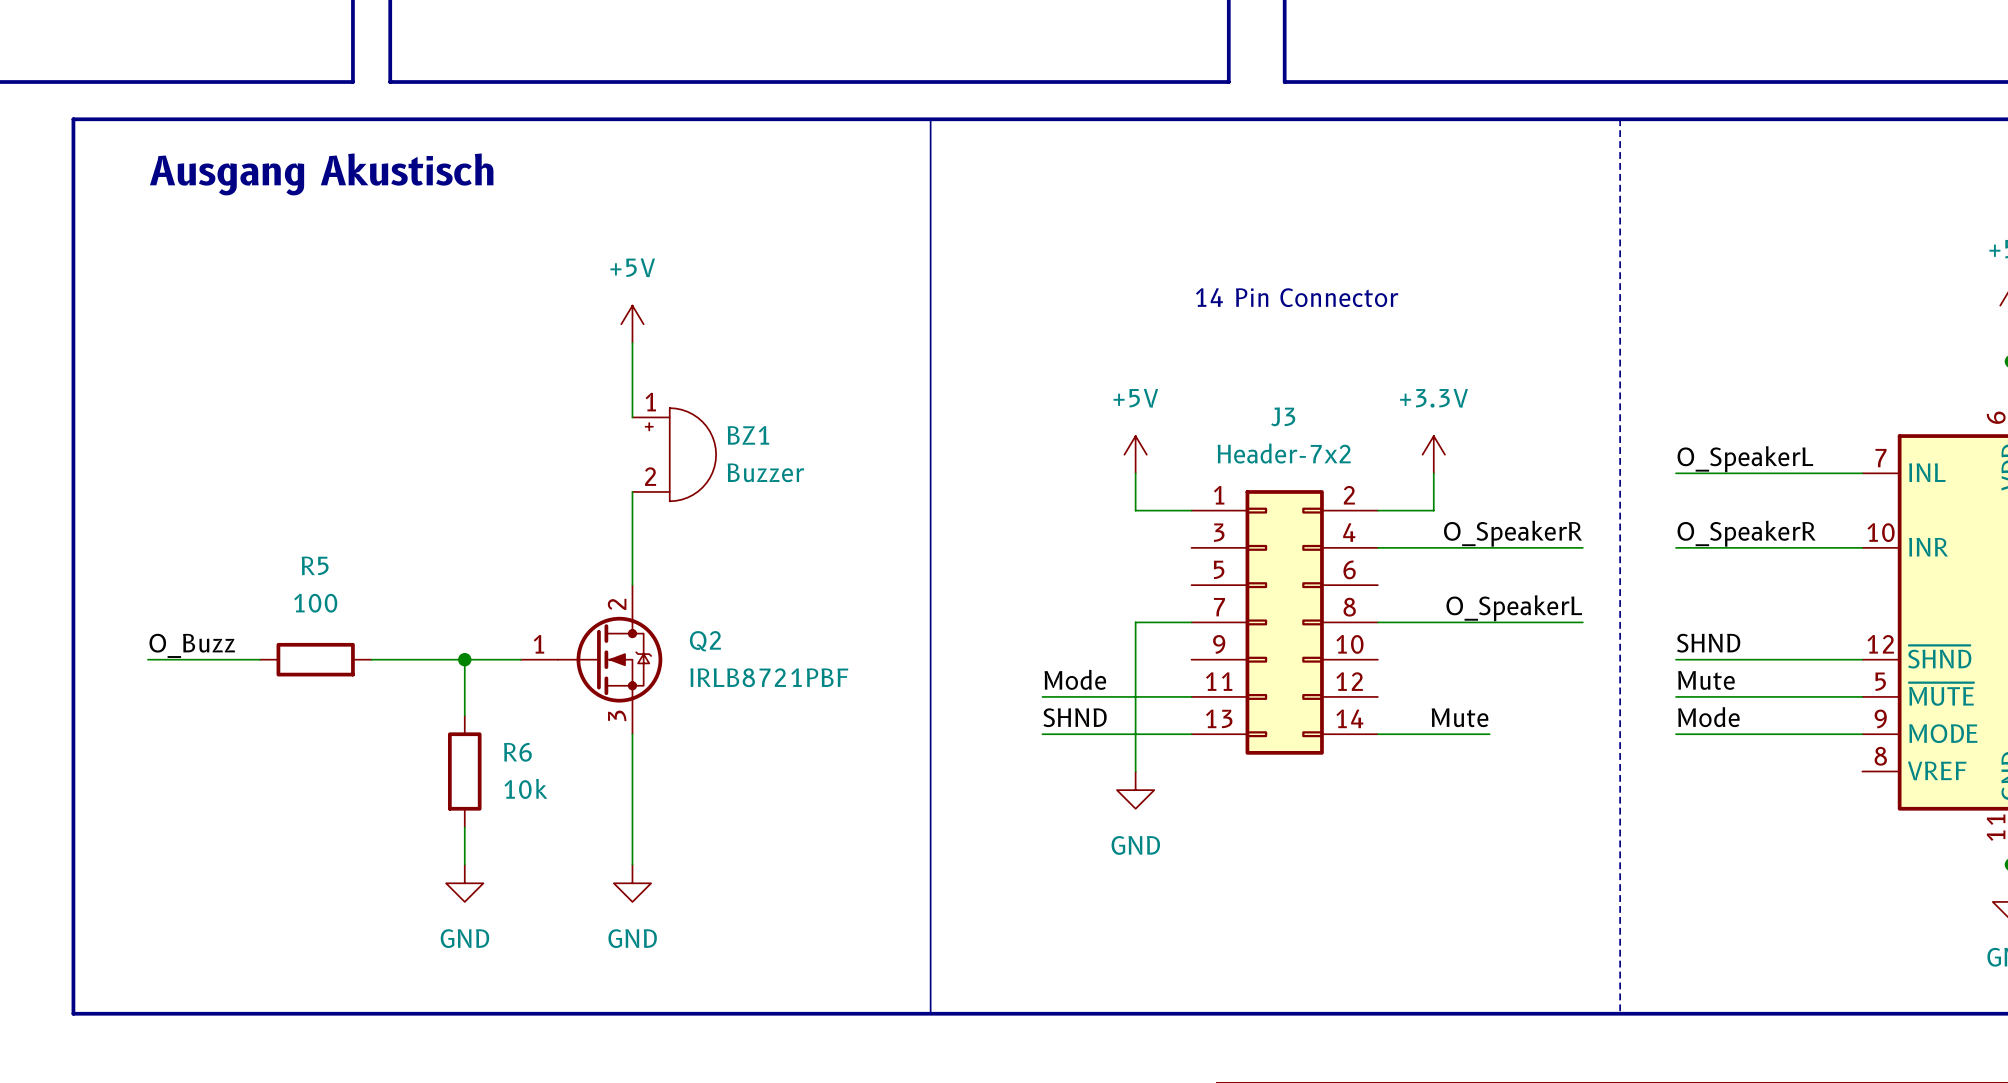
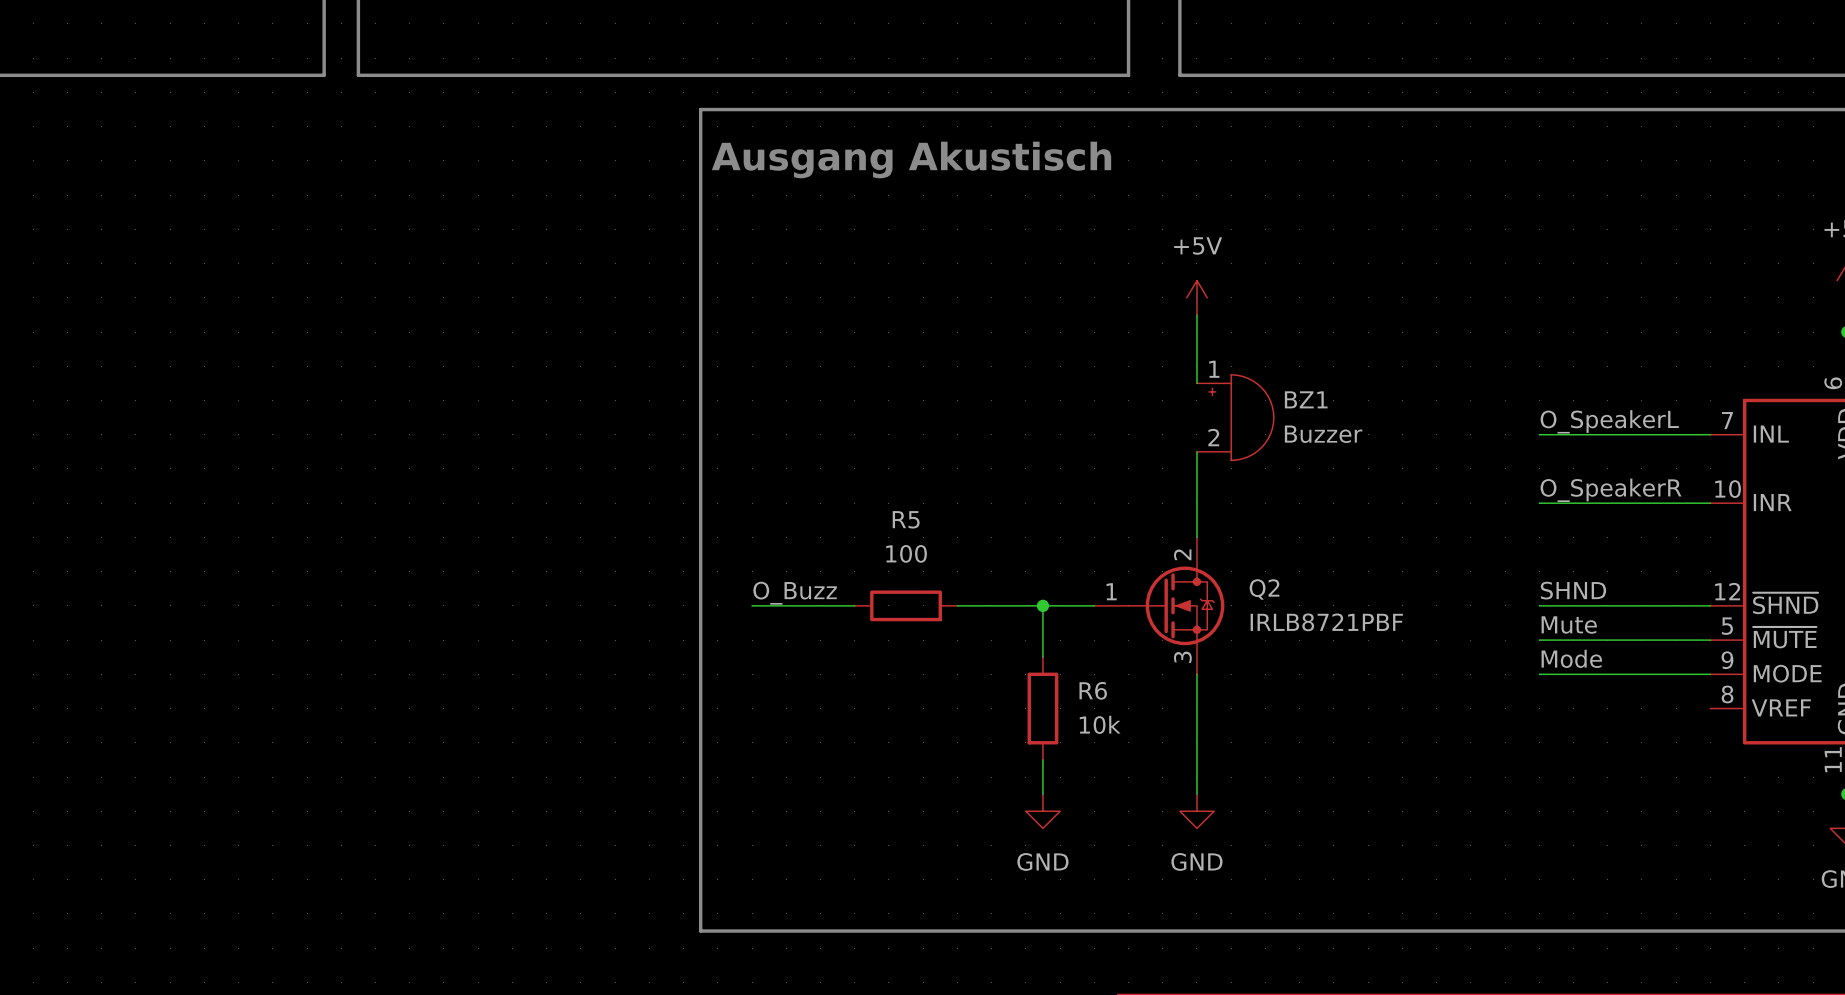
line: (762, 119) (73, 119) (73, 1013) (762, 1013) -> (700, 109) (700, 931)
line: (930, 119) (930, 1013) -> none
line: (1620, 119) (1620, 1013) -> none
text: Ausgang Akustisch (321, 174) -> none
text: none -> Ausgang Akustisch (911, 159)
text: 14 Pin Connector (1297, 297) -> none
power symbol: +5V (632, 324) -> none
wire: (632, 342) (632, 417) -> none
wire: none -> (1196, 314) (1196, 383)
BZ1 position: (674, 454) -> (1235, 417)
power symbol position: +5V (1135, 454) -> +5V (1196, 297)
power symbol: +3.3V (1433, 454) -> none
wire: (1135, 473) (1135, 510) (1191, 510) -> none
wire: (1433, 473) (1433, 510) (1377, 510) -> none
wire: (632, 491) (632, 585) -> none
label: O_SpeakerR (1513, 533) -> none
wire: (1377, 547) (1582, 547) -> none
label: O_SpeakerL (1514, 608) -> none
wire: (1191, 622) (1135, 622) (1135, 659) -> none
J3: Header-7x2 (1284, 622) -> none
wire: (1377, 622) (1582, 622) -> none
label: O_Buzz (192, 645) -> none
label: none -> O_Buzz (795, 593)
wire: (147, 659) (259, 659) -> none
R5 position: (315, 659) -> (906, 605)
wire: (371, 659) (520, 659) -> none
wire: (464, 659) (464, 715) -> none
junction: (464, 659) -> none
Q2 position: (591, 659) -> (1159, 605)
wire: none -> (752, 605) (854, 605)
junction: none -> (1042, 605)
label: Mode (1075, 679) -> none
wire: (1042, 696) (1191, 696) -> (957, 605) (1094, 605)
wire: (1135, 715) (1135, 771) -> none
label: SHND (1075, 717) -> none
label: Mute (1460, 717) -> none
wire: (632, 734) (632, 864) -> none
wire: (1042, 734) (1191, 734) -> none
wire: none -> (1196, 674) (1196, 794)
wire: (1377, 734) (1489, 734) -> none
R6 position: (464, 771) -> (1042, 708)
power symbol position: GND (1135, 790) -> GND (1042, 811)
wire: (464, 827) (464, 864) -> none
wire: none -> (1042, 759) (1042, 794)
power symbol: GND (464, 883) -> none
power symbol: GND (632, 883) -> none
power symbol: none -> GND (1196, 811)

